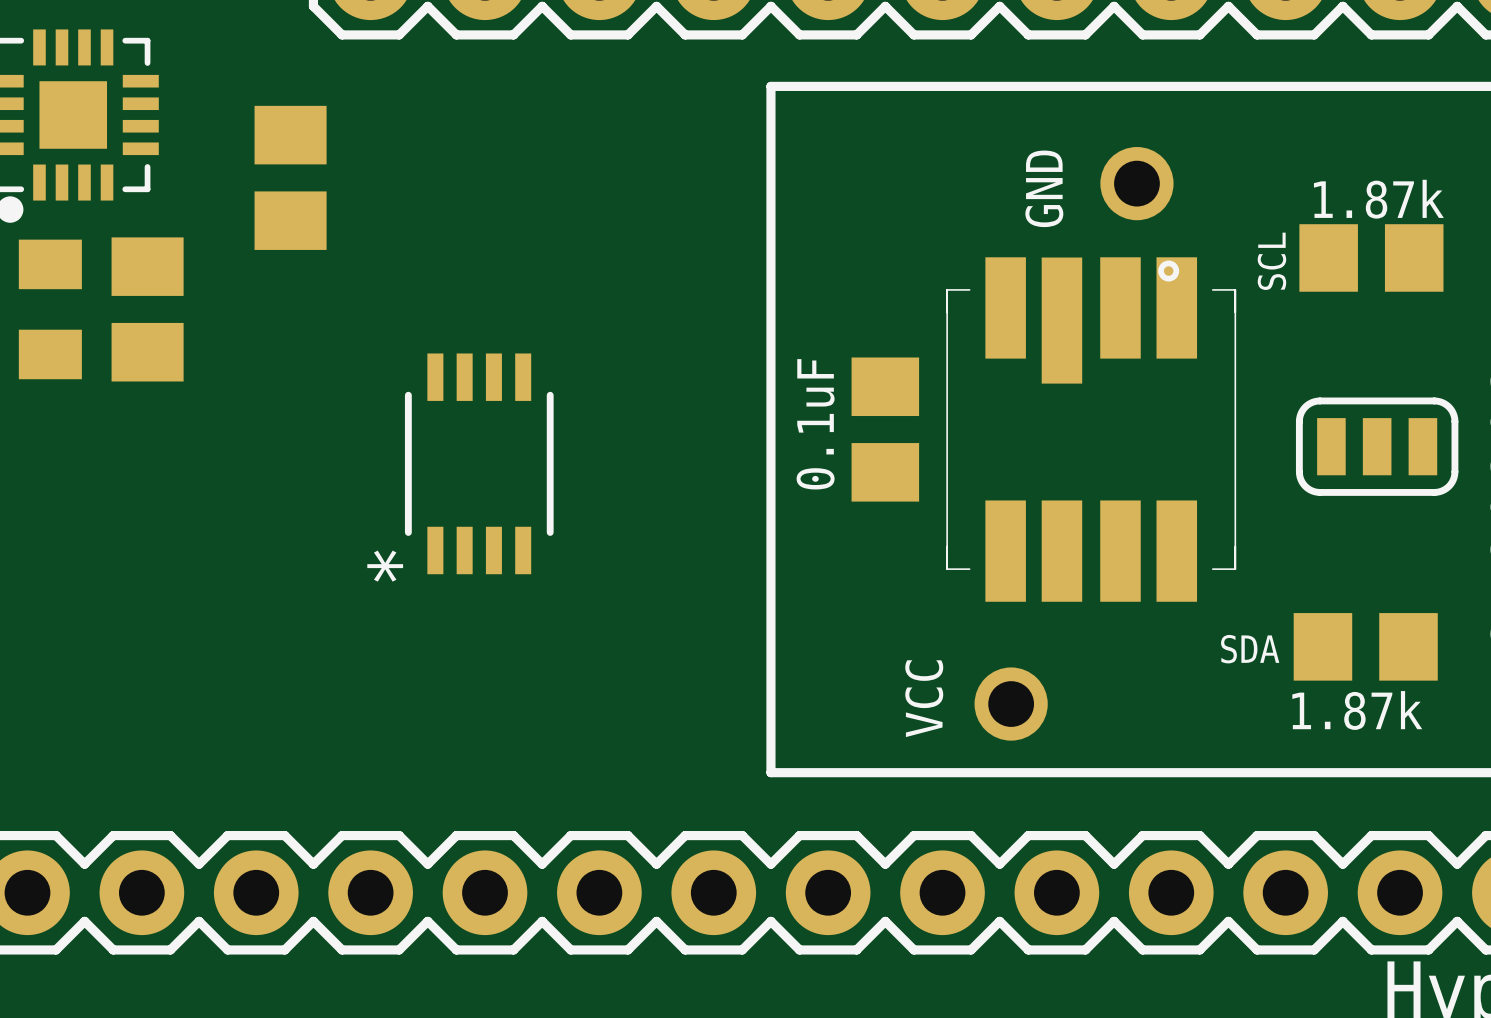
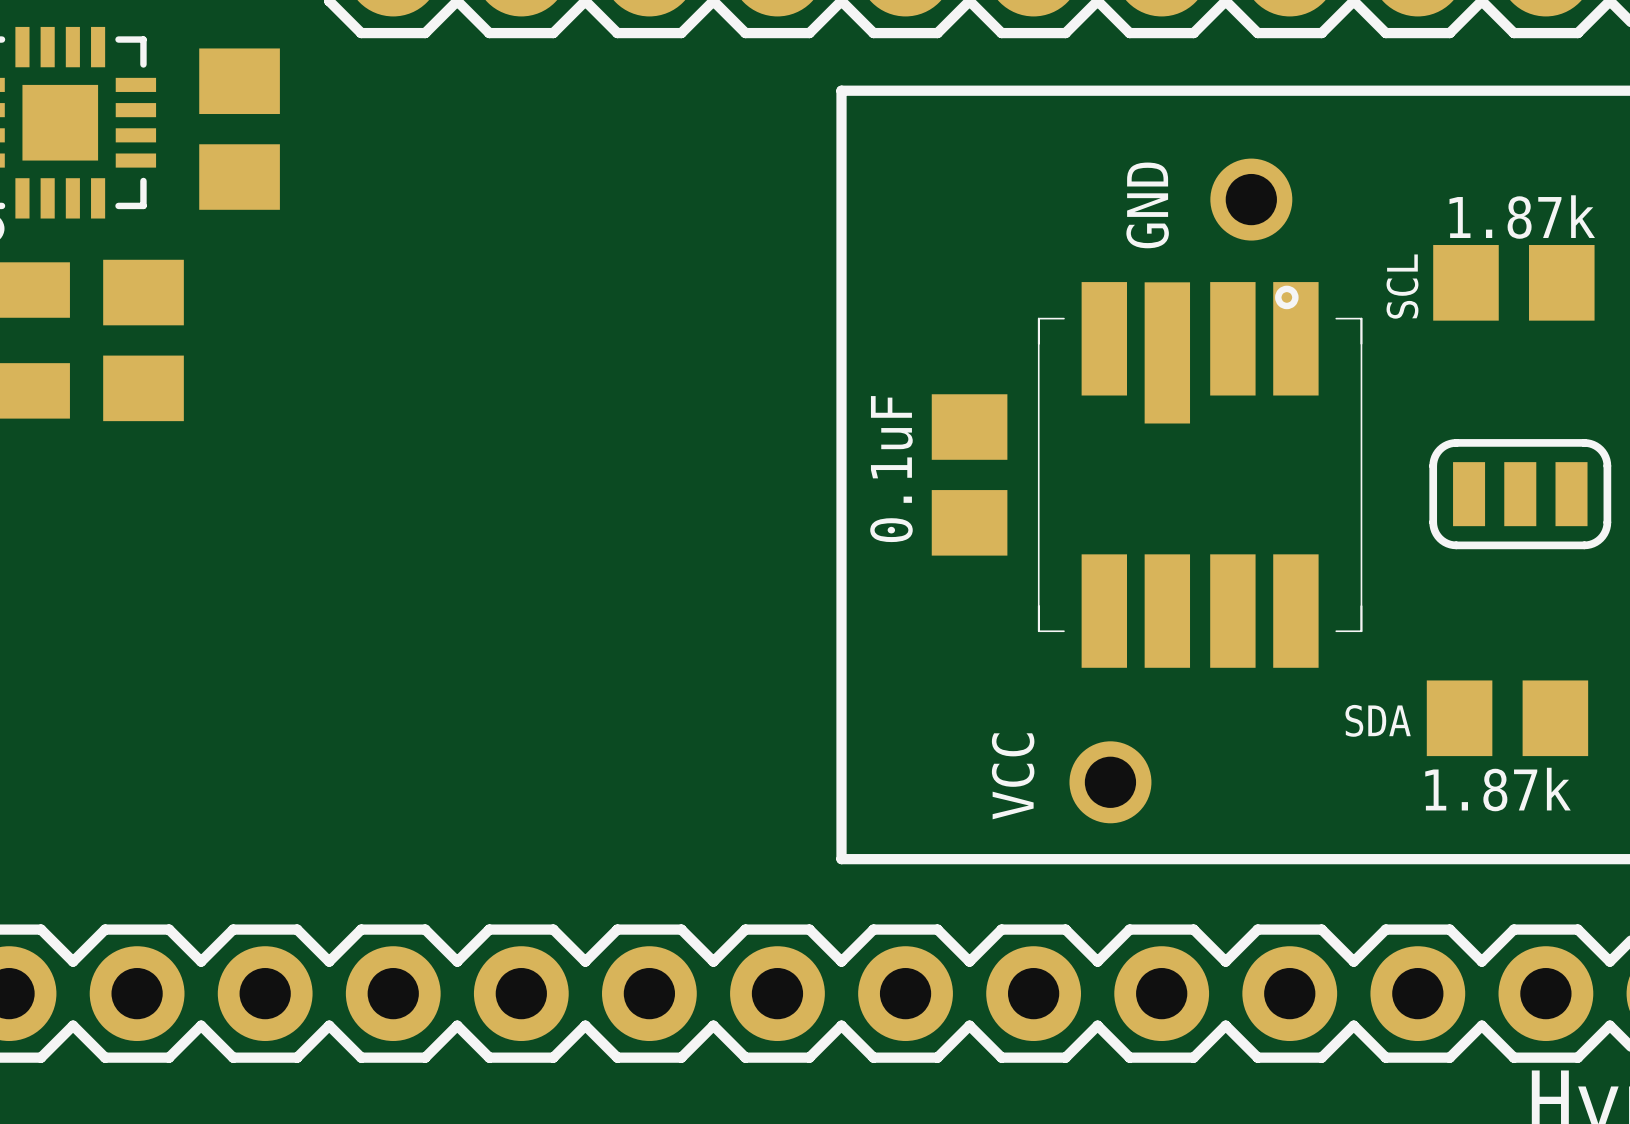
part position: (290, 177) -> (239, 129)
part: (479, 463) -> none

